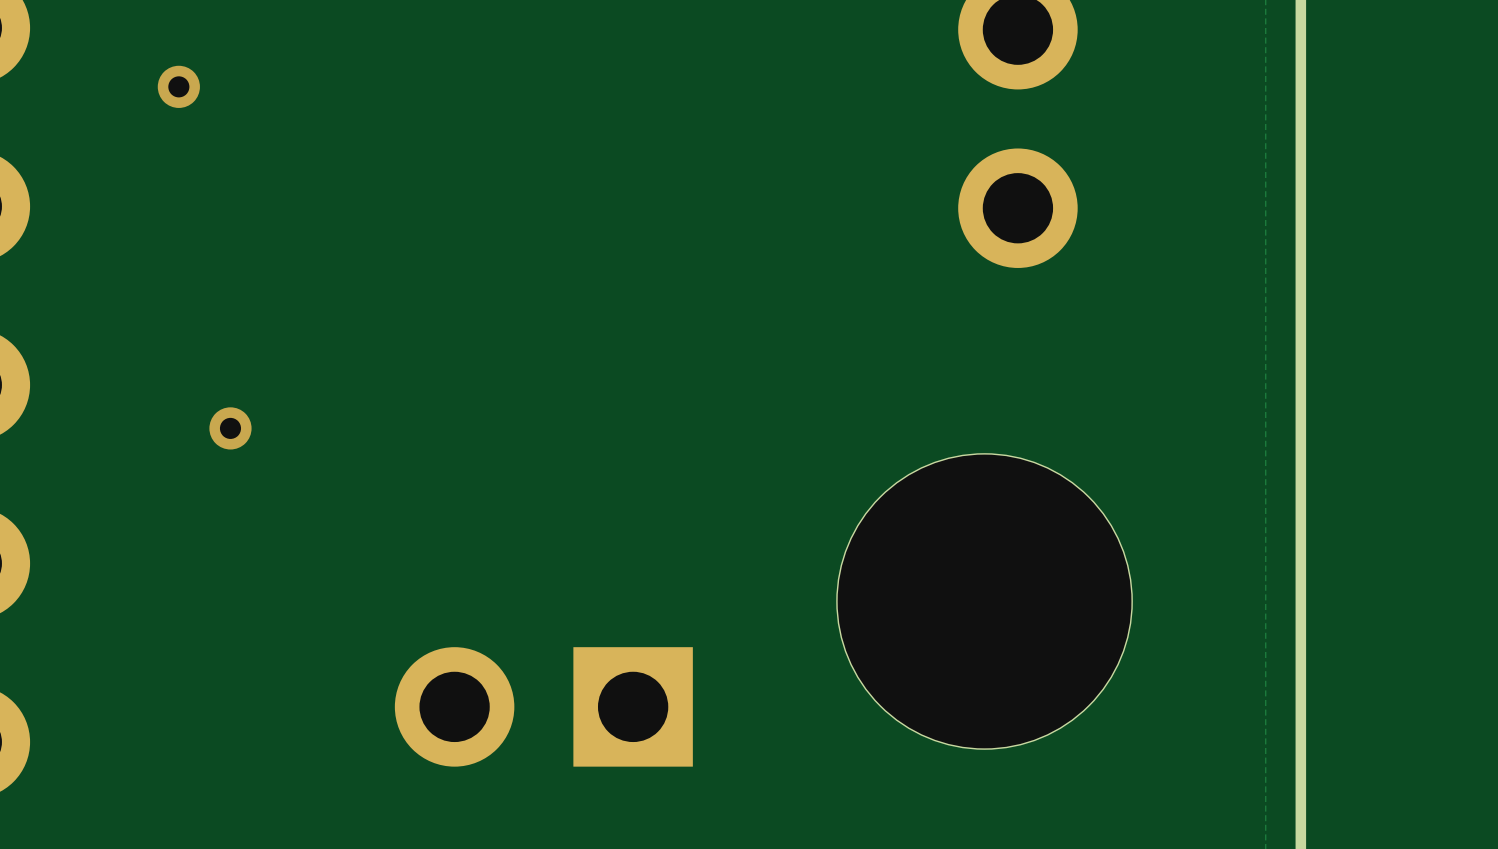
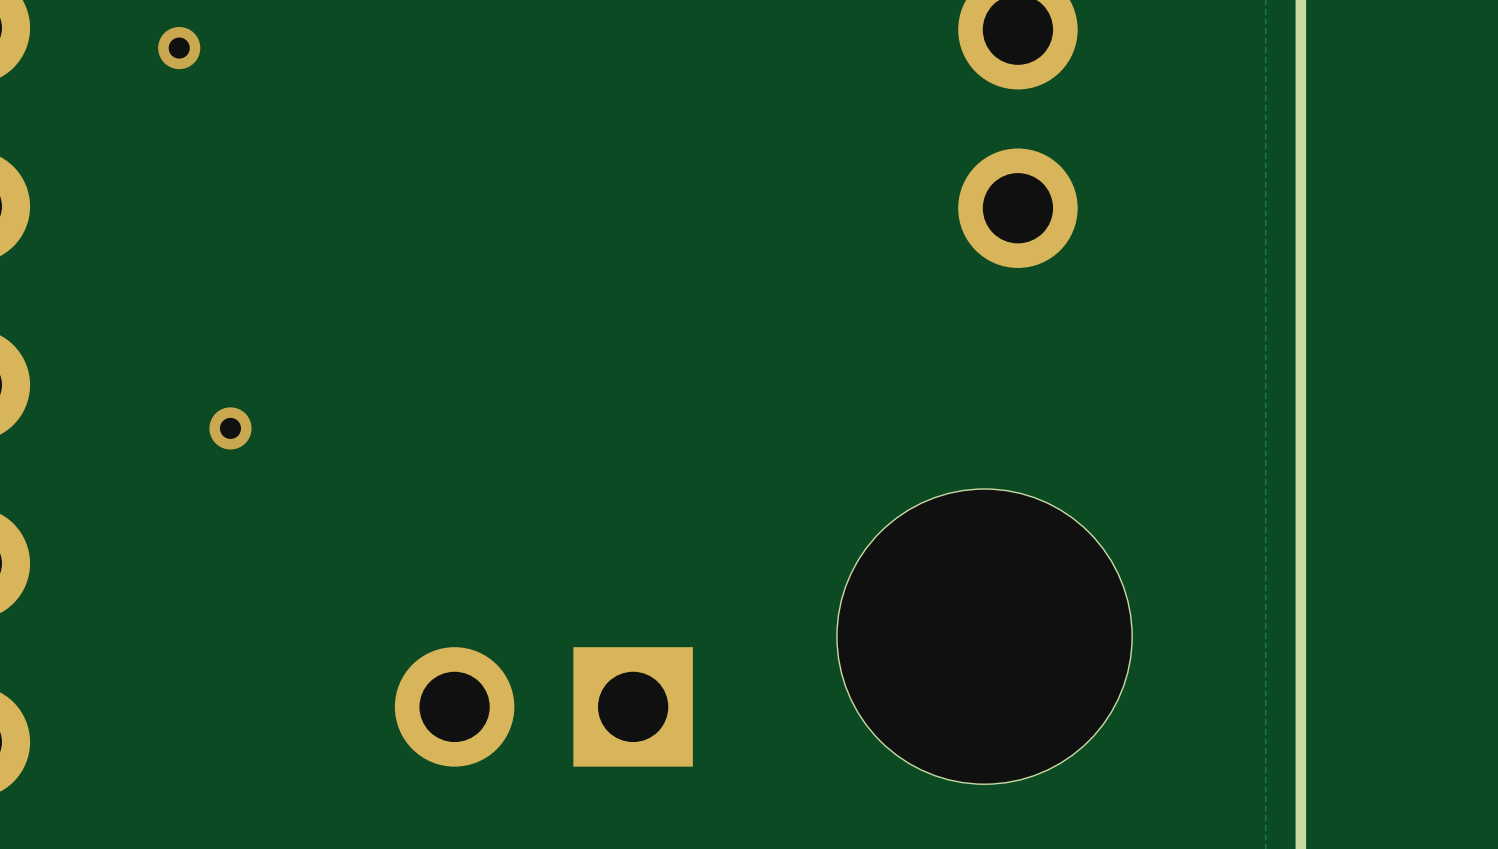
via position: (178, 86) -> (179, 48)
part position: (984, 601) -> (984, 636)

